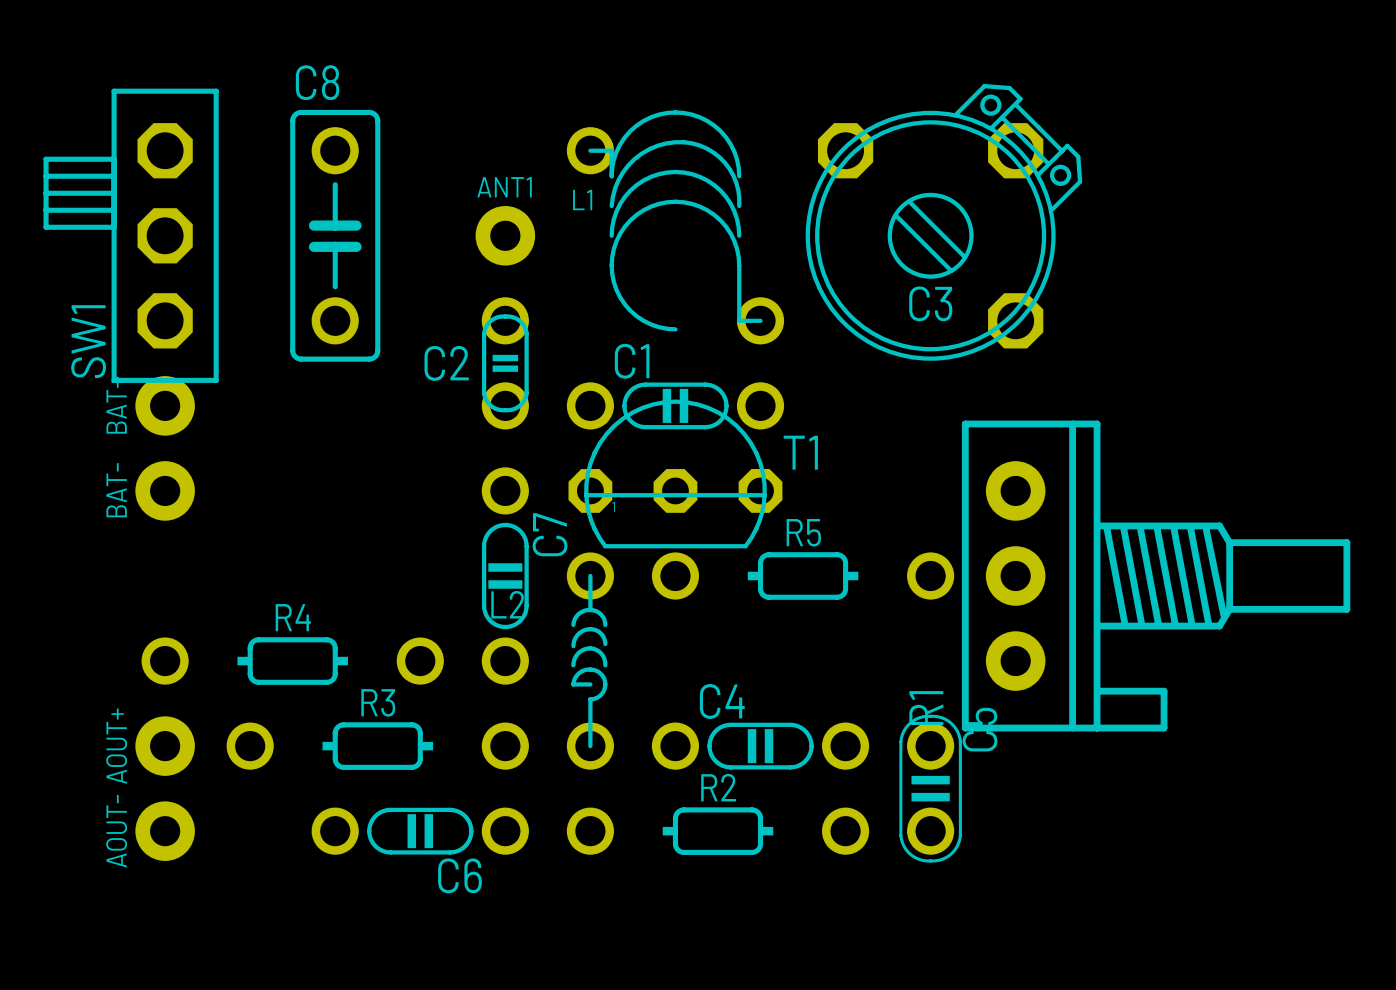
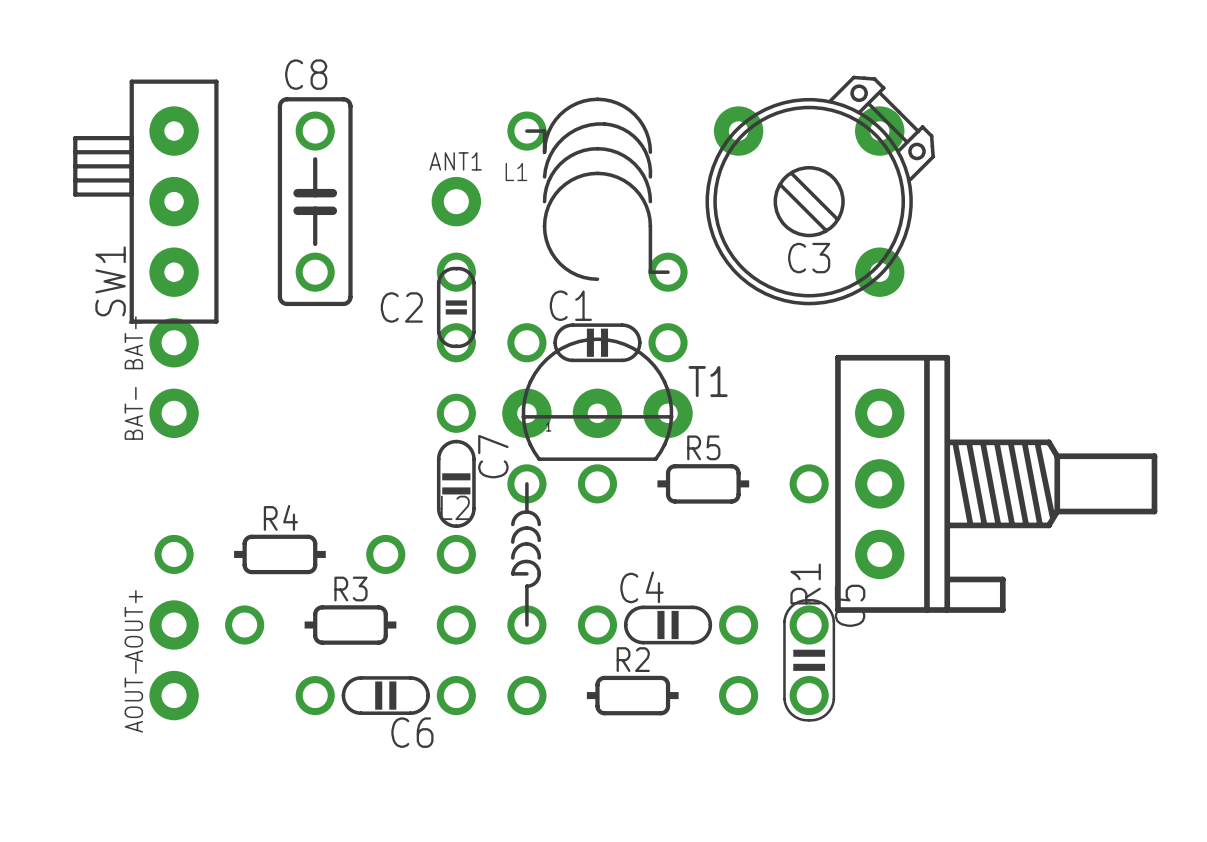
C3 footprint: [805, 84, 1083, 361] -> [705, 75, 935, 306]
SW1 footprint: [43, 88, 219, 383] -> [73, 79, 219, 324]
T1 footprint: [568, 399, 783, 549] -> [502, 337, 693, 461]

